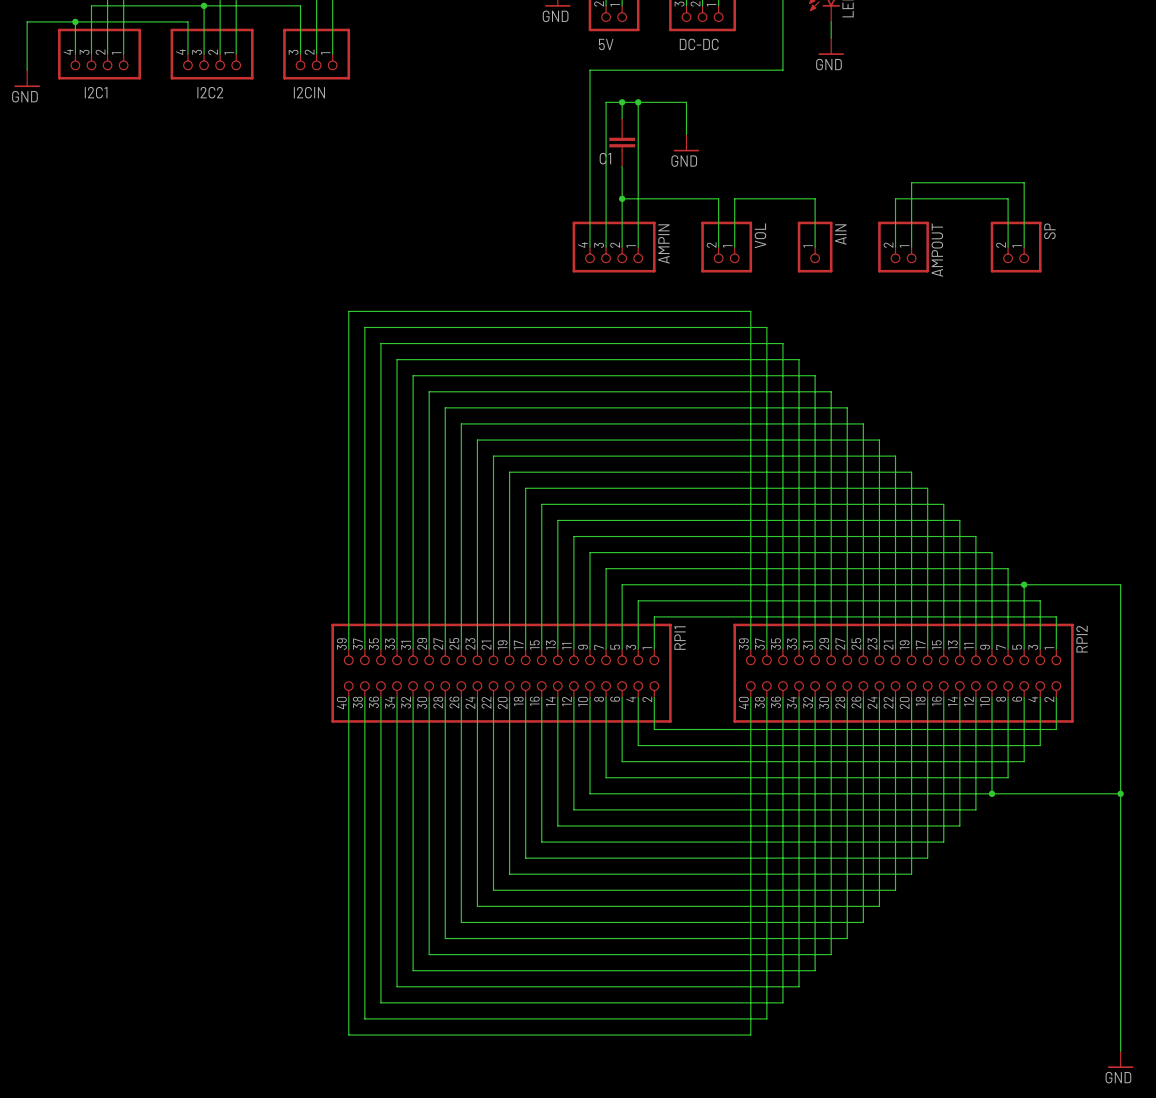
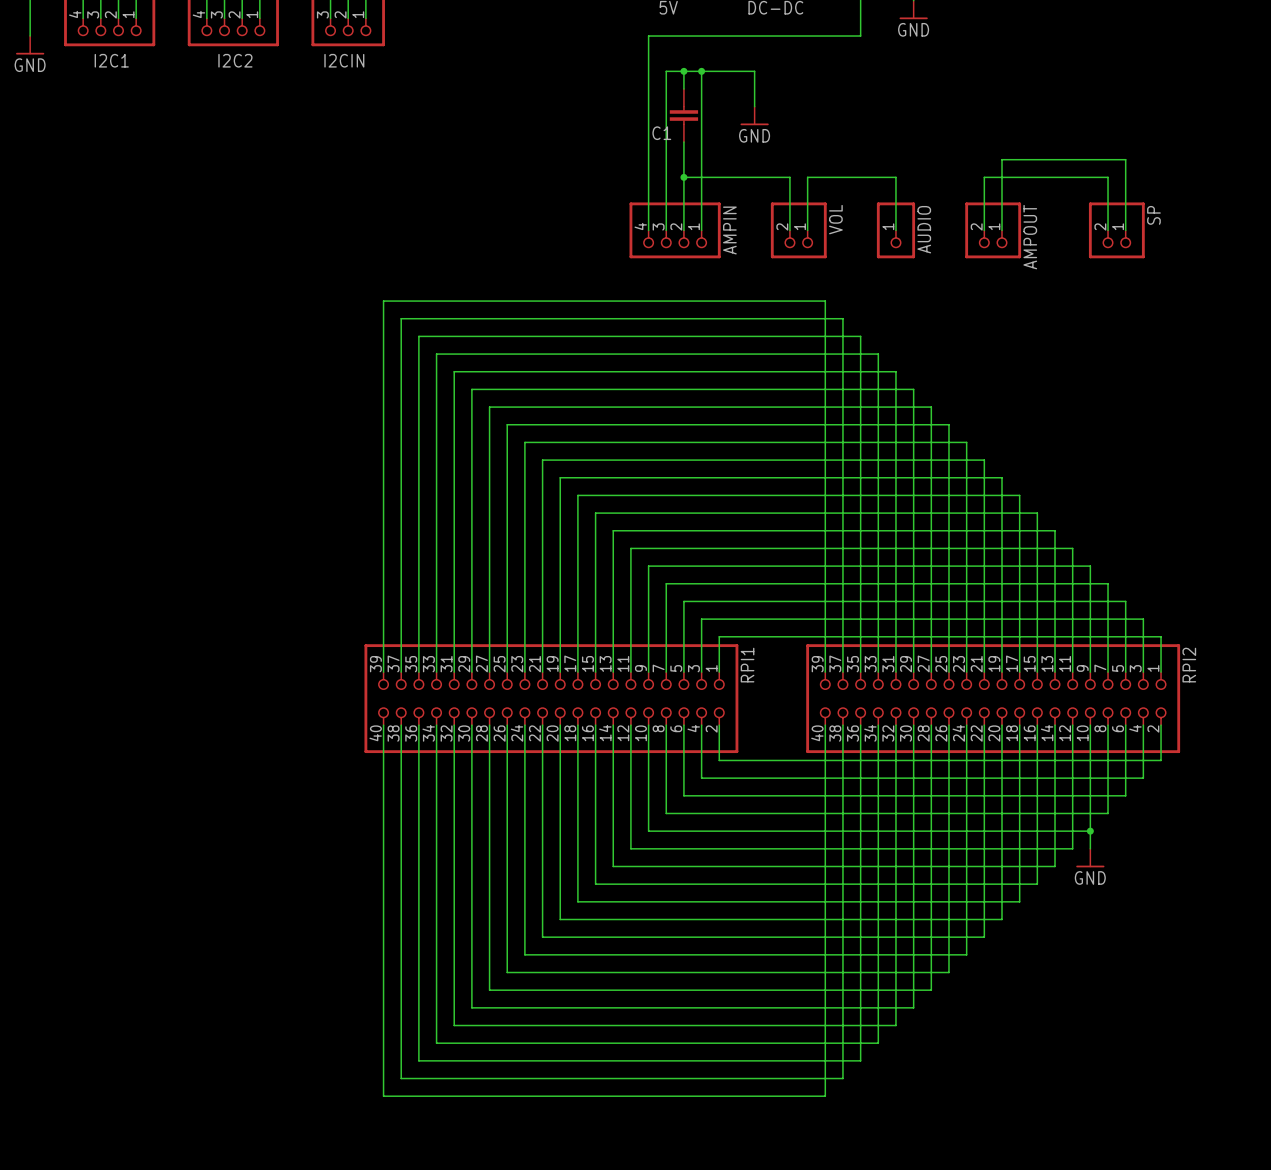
AIN name: AIN (840, 234) -> AUDIO (924, 229)
wire: (1024, 584) (1120, 584) (1120, 1051) -> none
junction: (1024, 584) -> none
wire: (992, 793) (1120, 793) -> (1090, 831) (1090, 848)
junction: (1120, 793) -> none
power symbol: none -> GND (1090, 858)
power symbol: GND (1120, 1059) -> none

